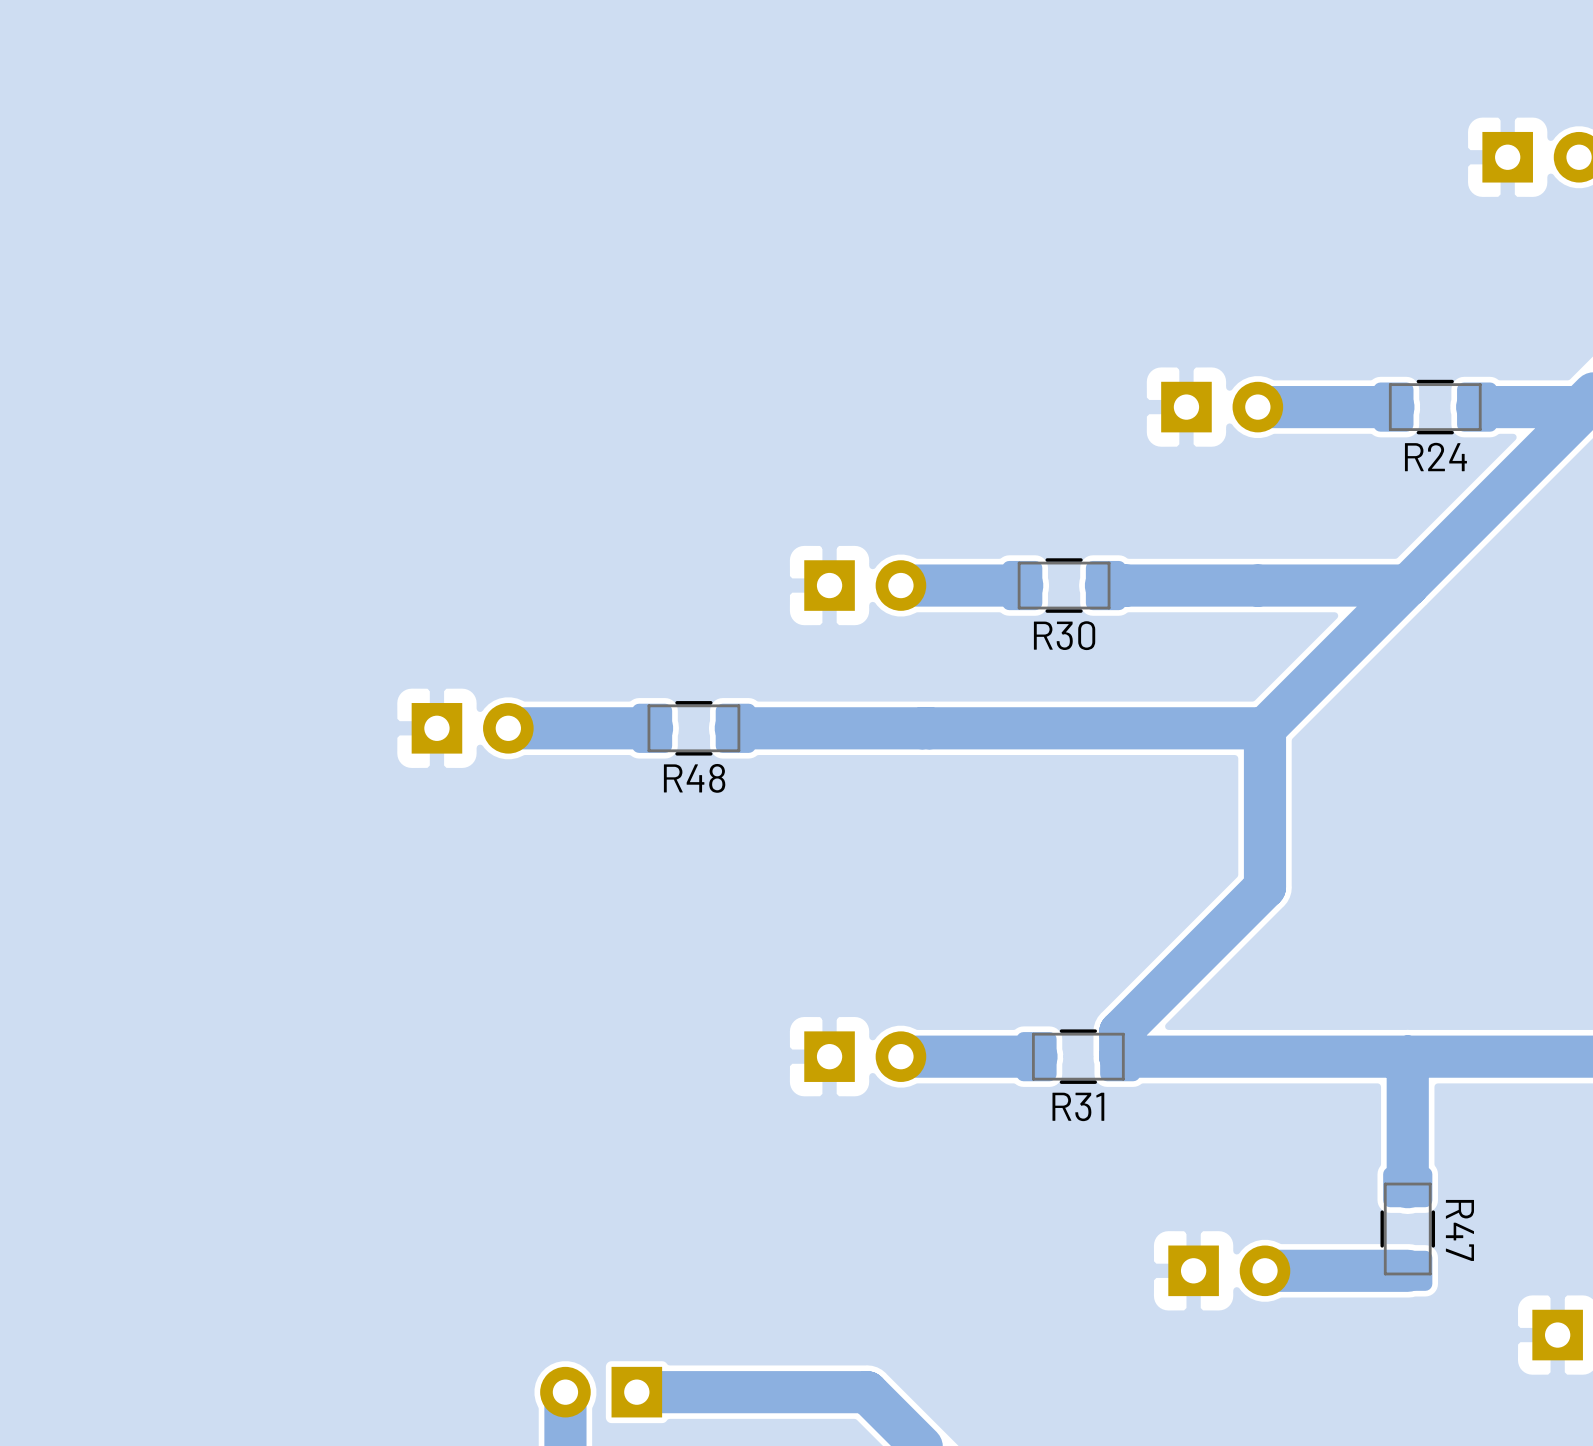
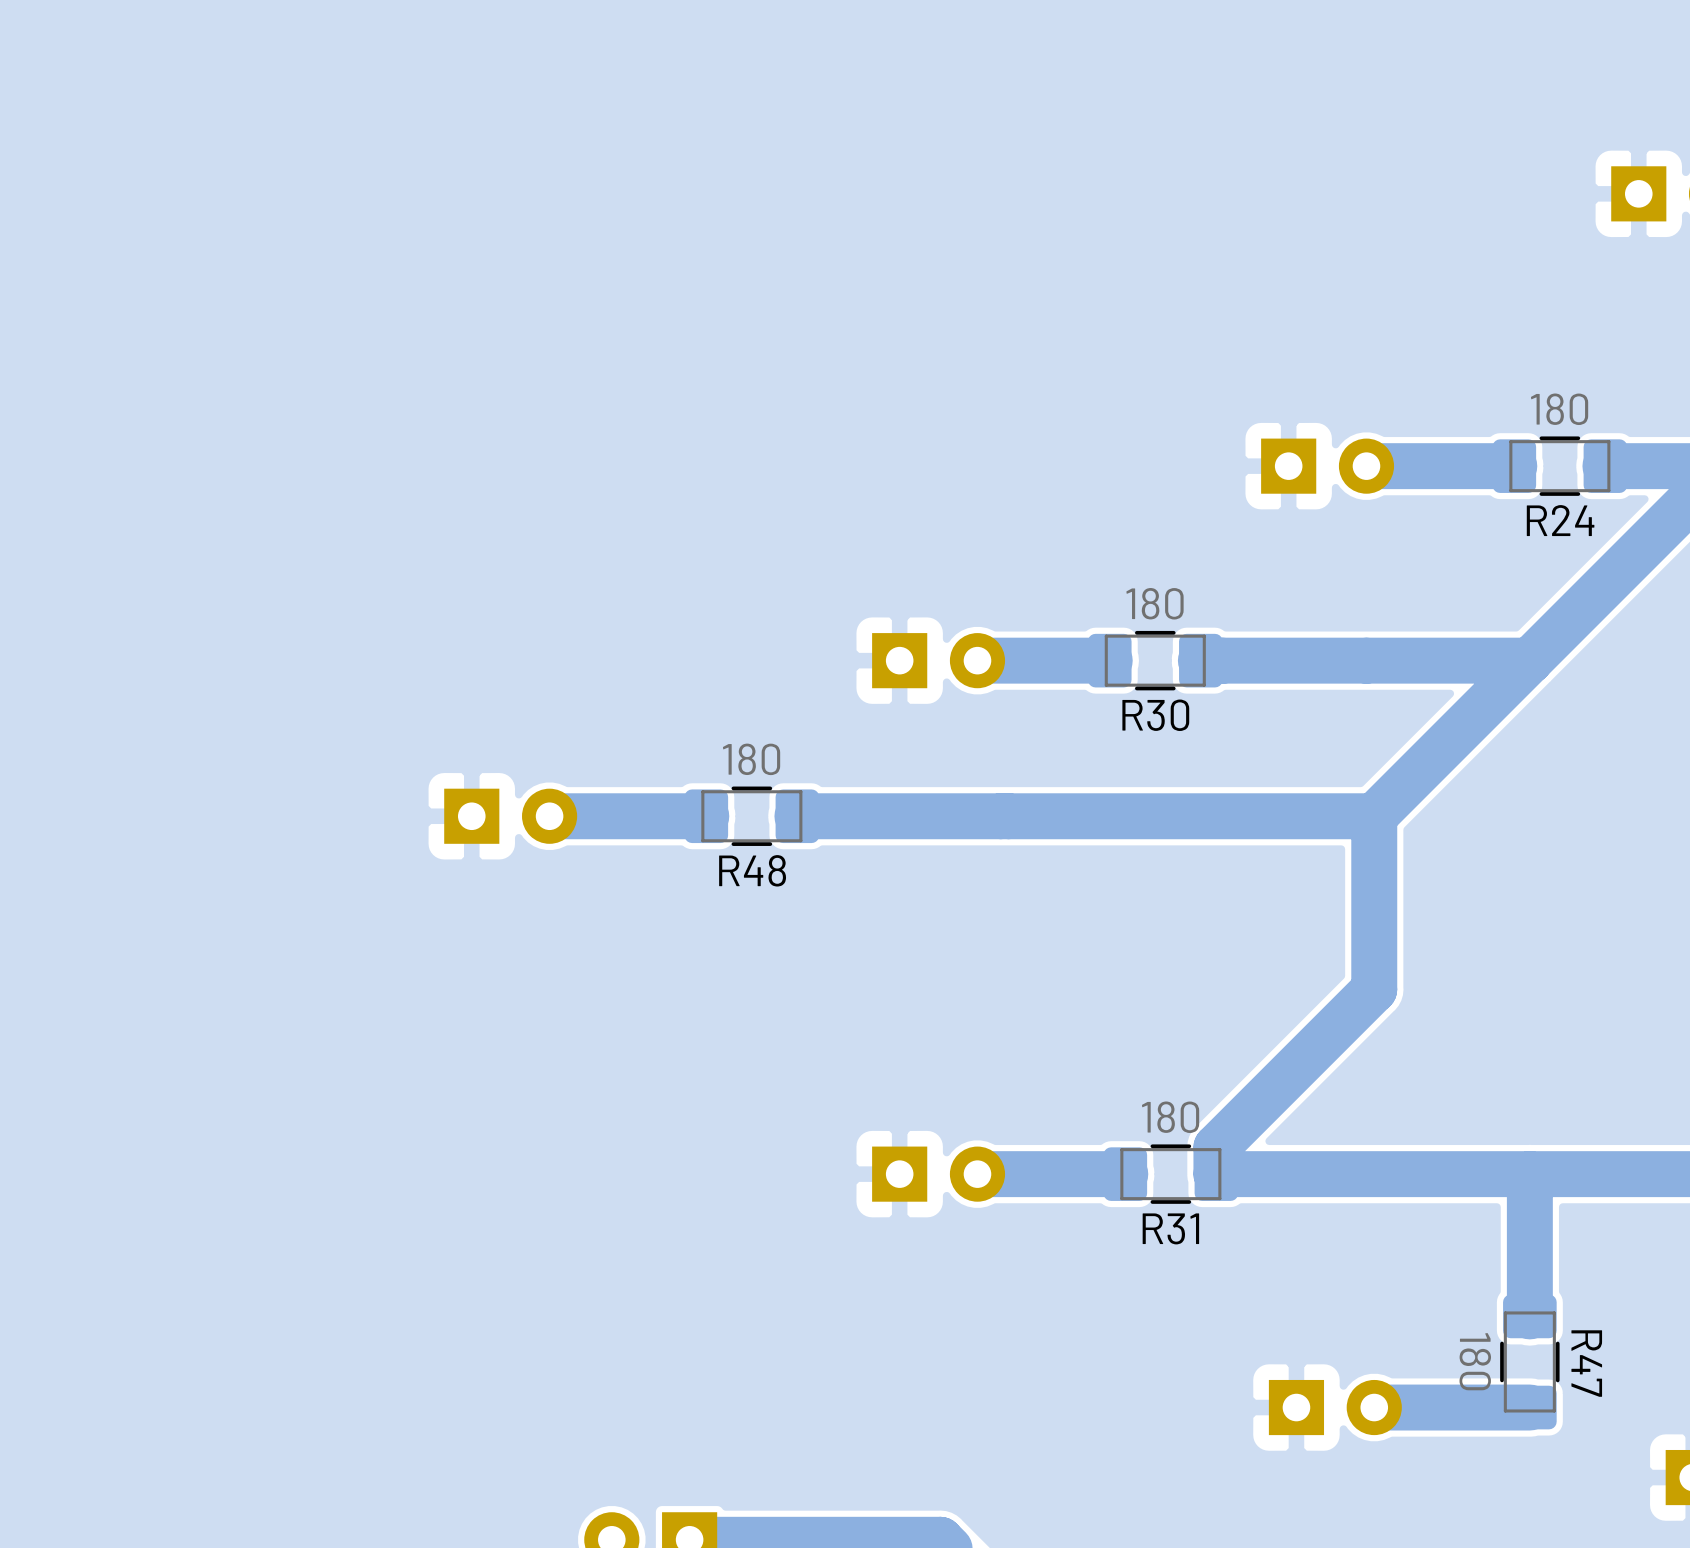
R24 value: none -> 180 (1559, 409)
R30 value: none -> 180 (1155, 603)
R48 value: none -> 180 (751, 759)
R31 value: none -> 180 (1170, 1117)
R47 value: none -> 180 (1475, 1361)

